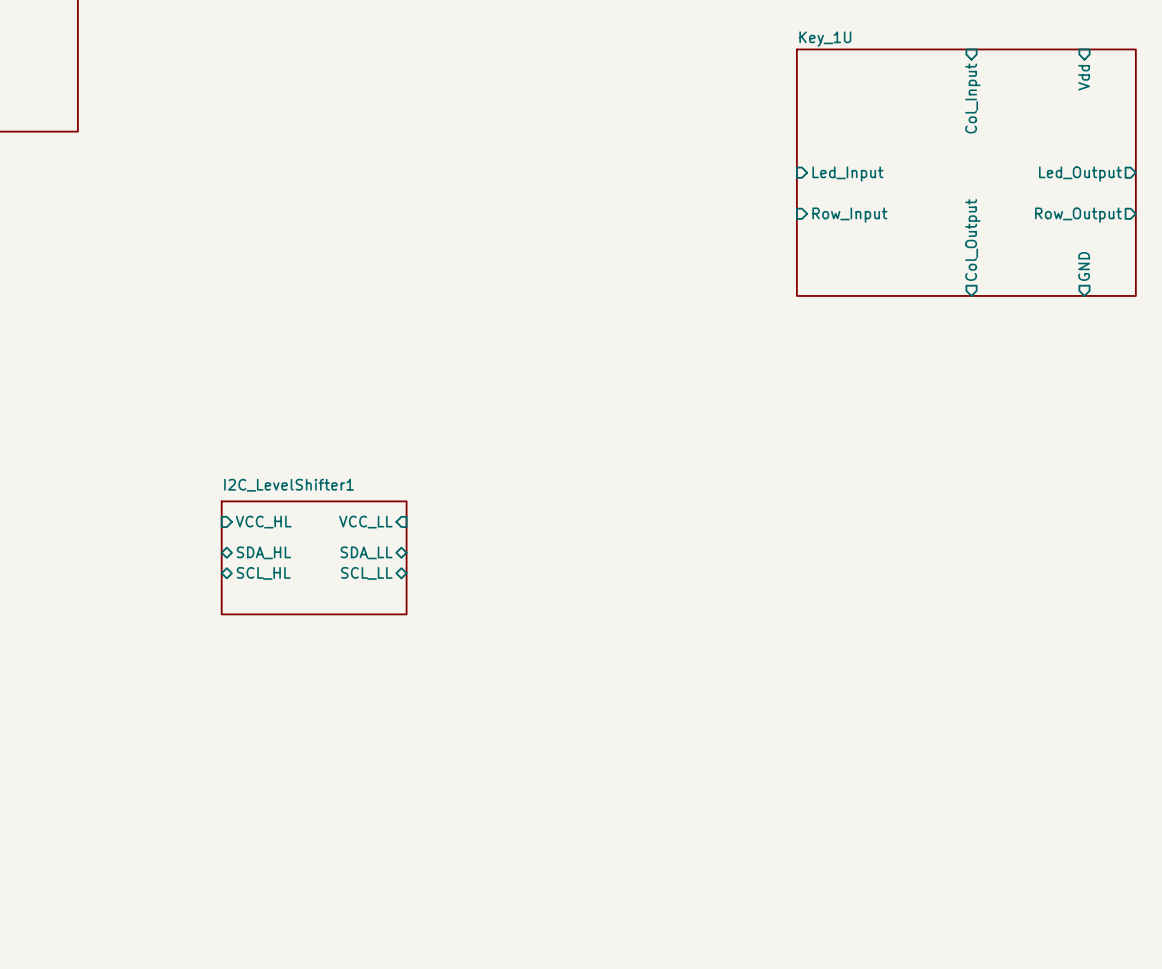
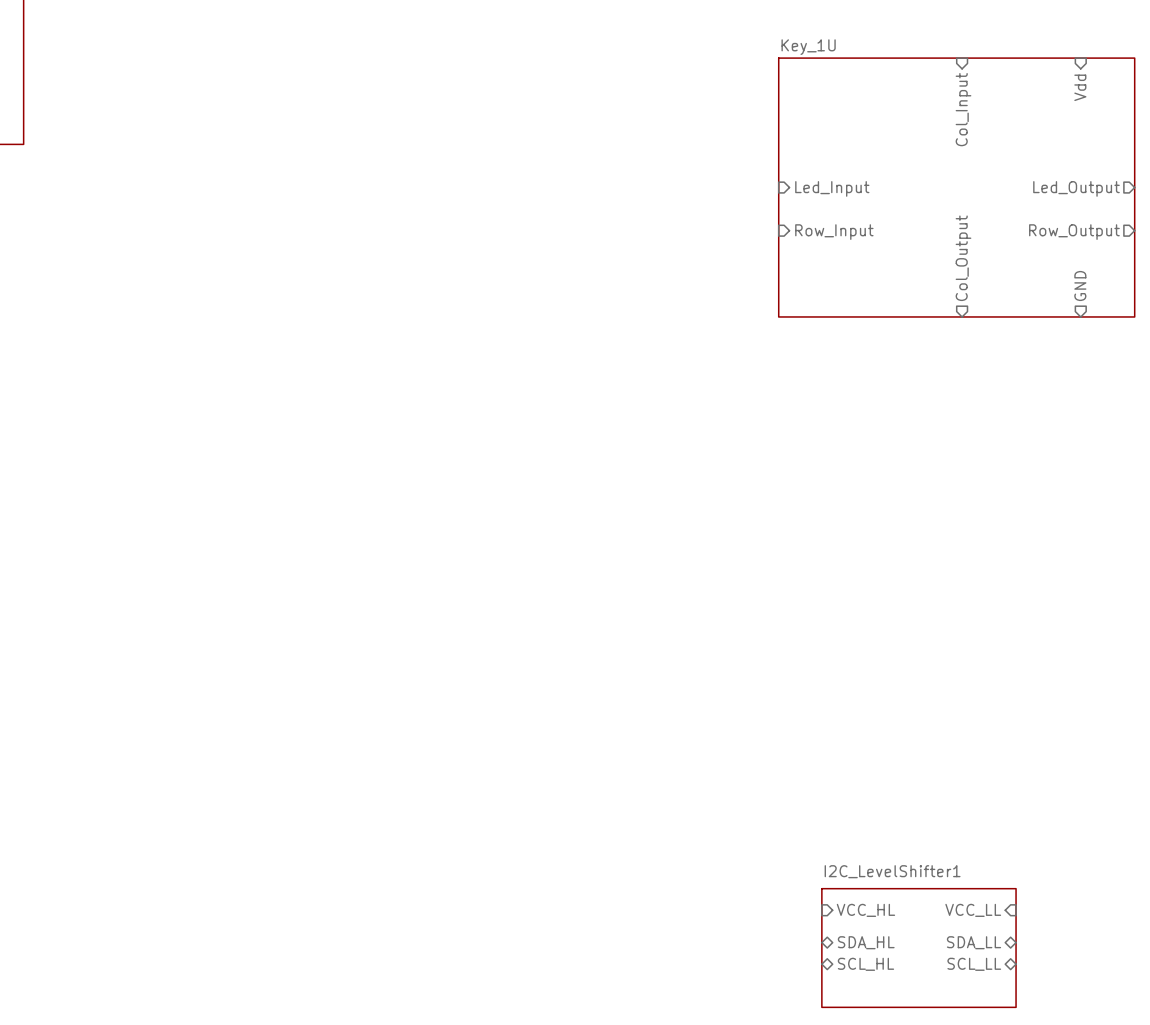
sheet pin: VCC_HL (263, 522) -> none
sheet pin: VCC_LL (365, 522) -> none
sheet pin: SDA_HL (263, 552) -> none
sheet pin: SDA_LL (366, 552) -> none
sheet I2C_LevelShifter1 position: (314, 557) -> (918, 948)
sheet pin: SCL_HL (263, 573) -> none
sheet pin: SCL_LL (366, 573) -> none
sheet pin: none -> VCC_HL (865, 910)
sheet pin: none -> VCC_LL (973, 910)
sheet pin: none -> SDA_HL (866, 942)
sheet pin: none -> SDA_LL (974, 942)
sheet pin: none -> SCL_HL (865, 964)
sheet pin: none -> SCL_LL (974, 964)

